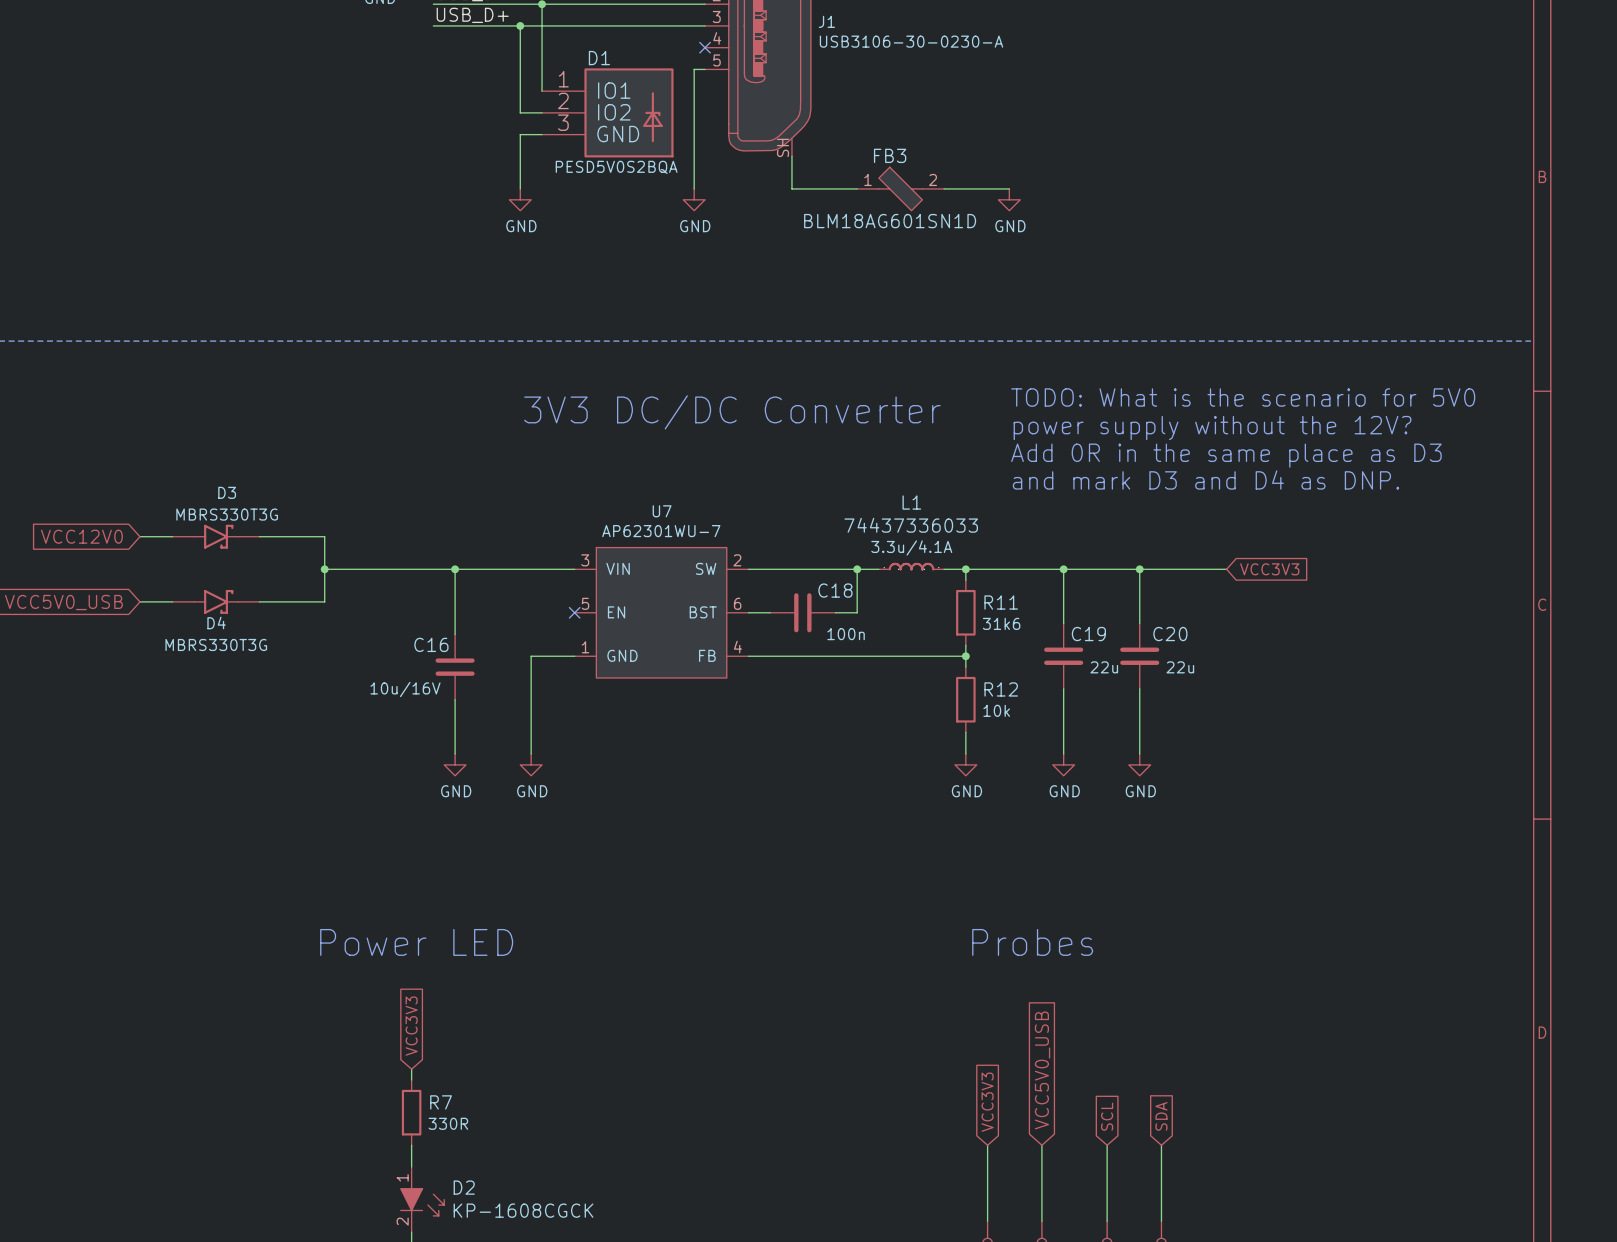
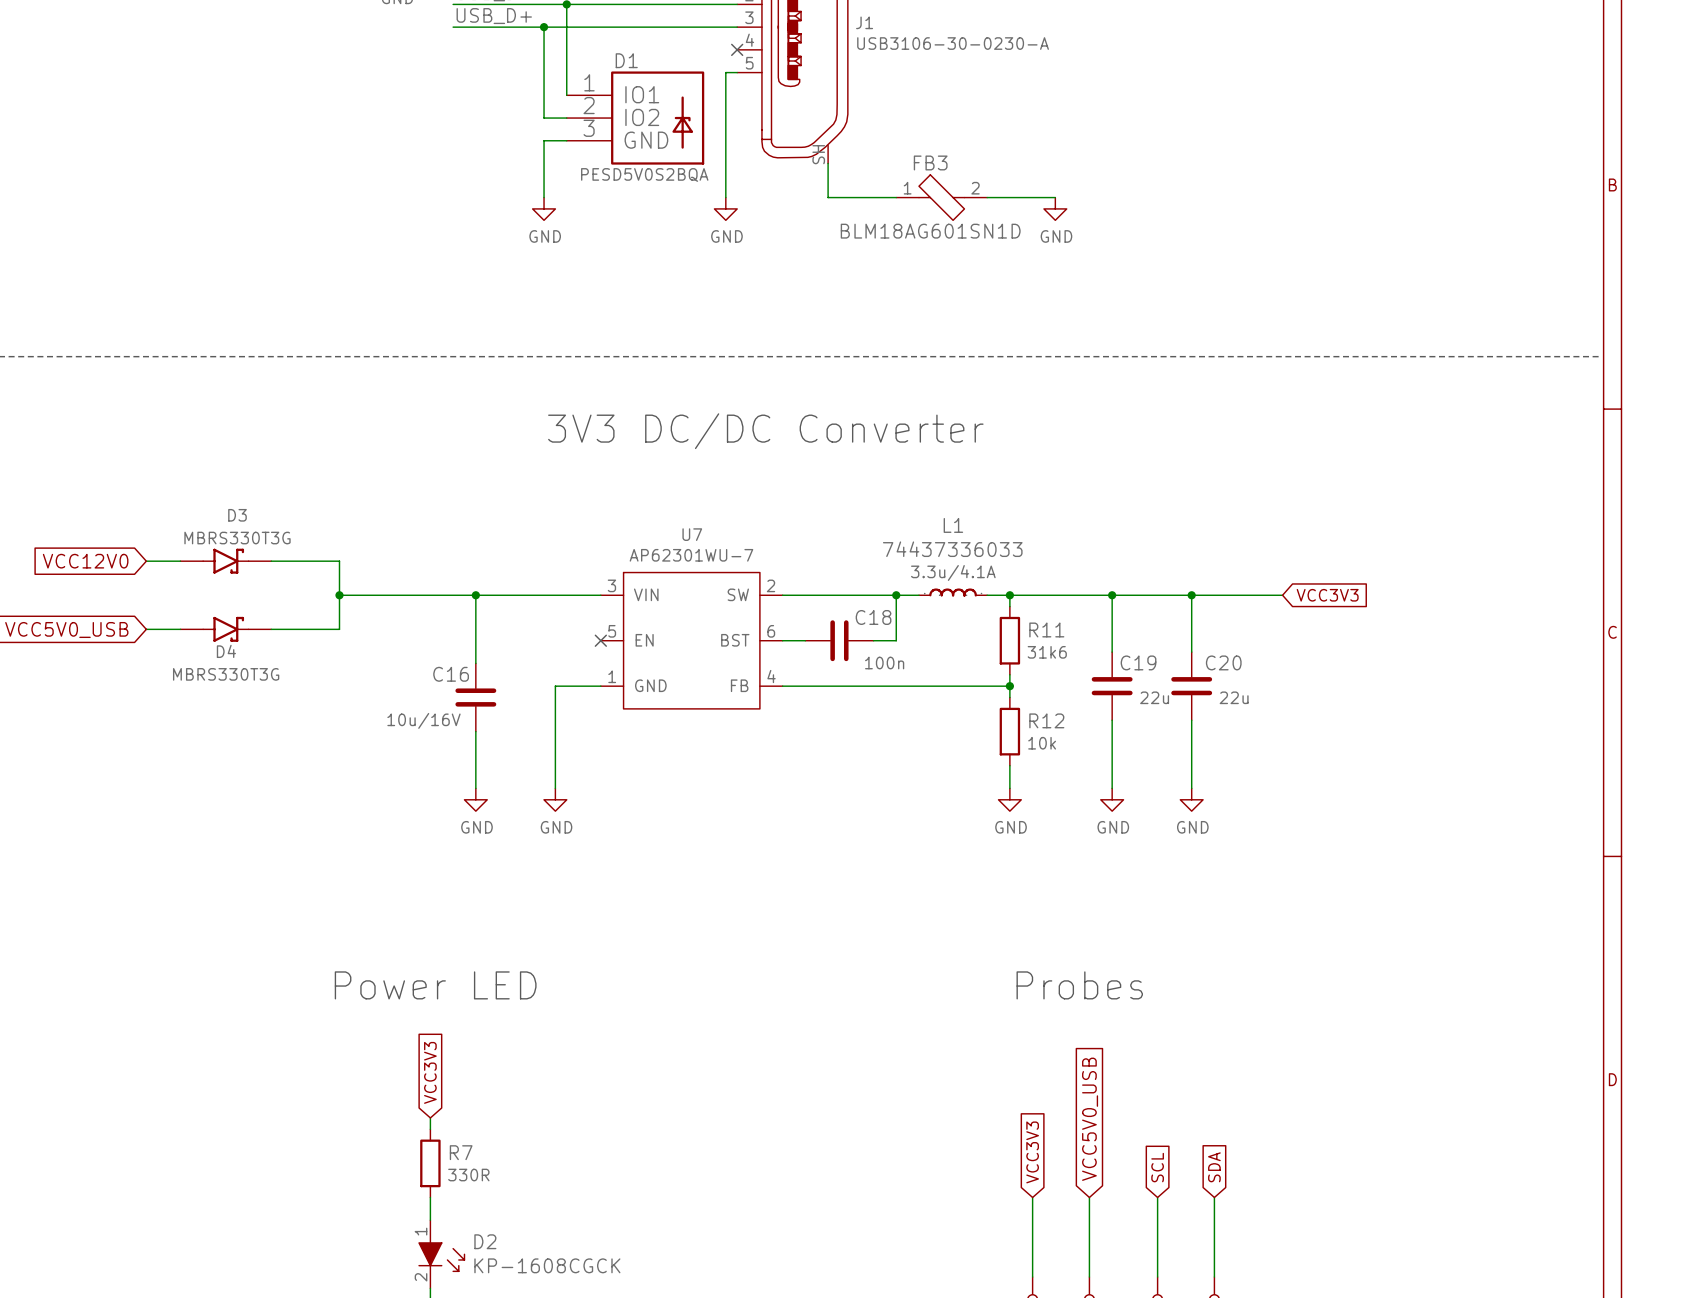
text: TODO: What is the scenario for 5V0 (1243, 397) -> none
text: power supply without the 12V? (1212, 427) -> none
text: Add 0R in the same place as D3 (1226, 455) -> none
text: and mark D3 and D4 as DNP. (1206, 480) -> none

